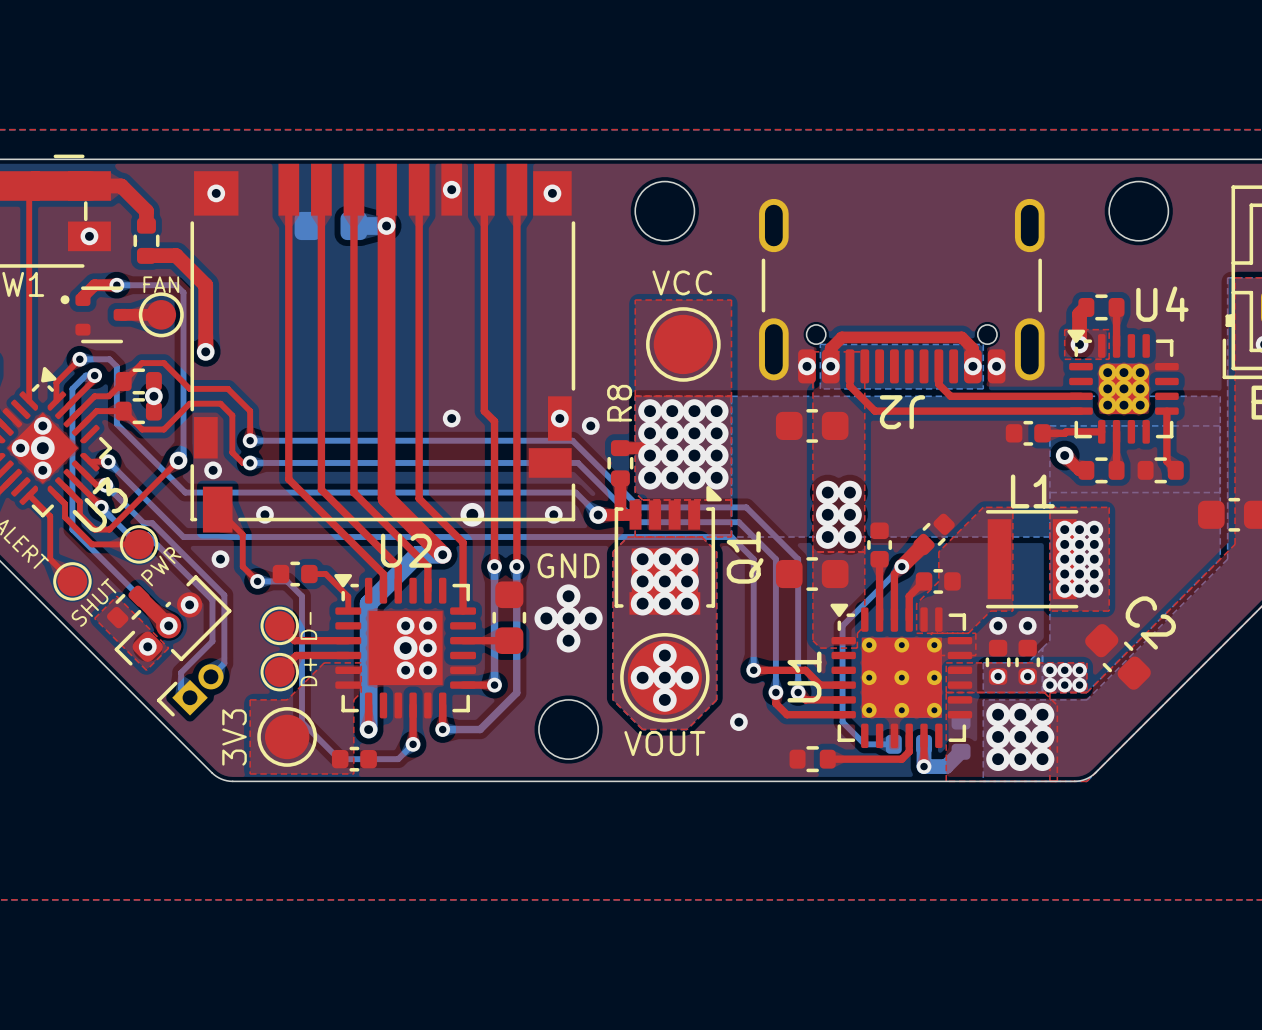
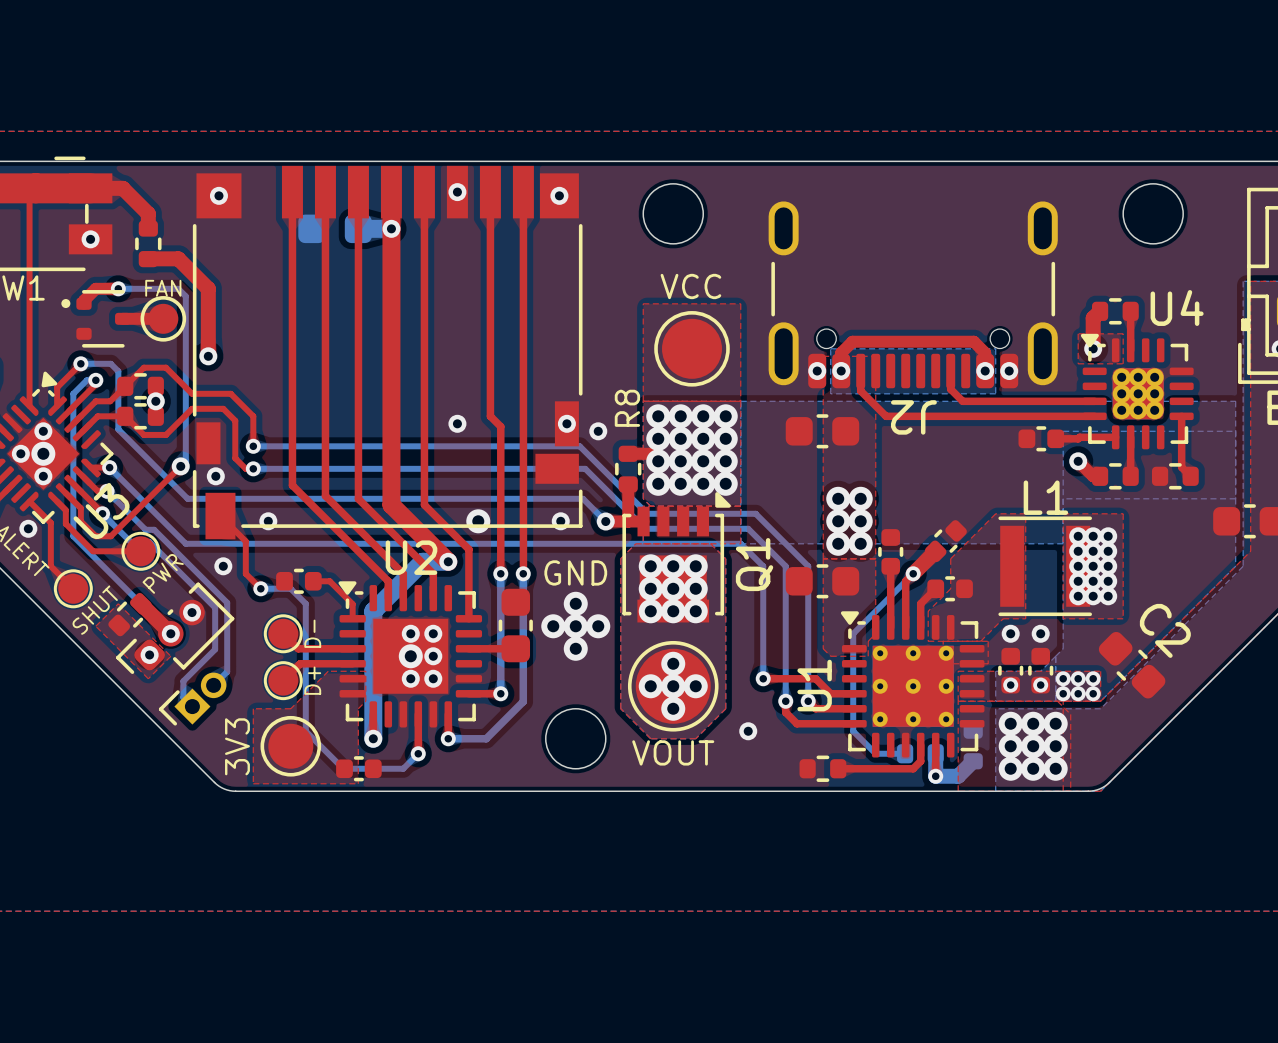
via: none -> (28, 528)

